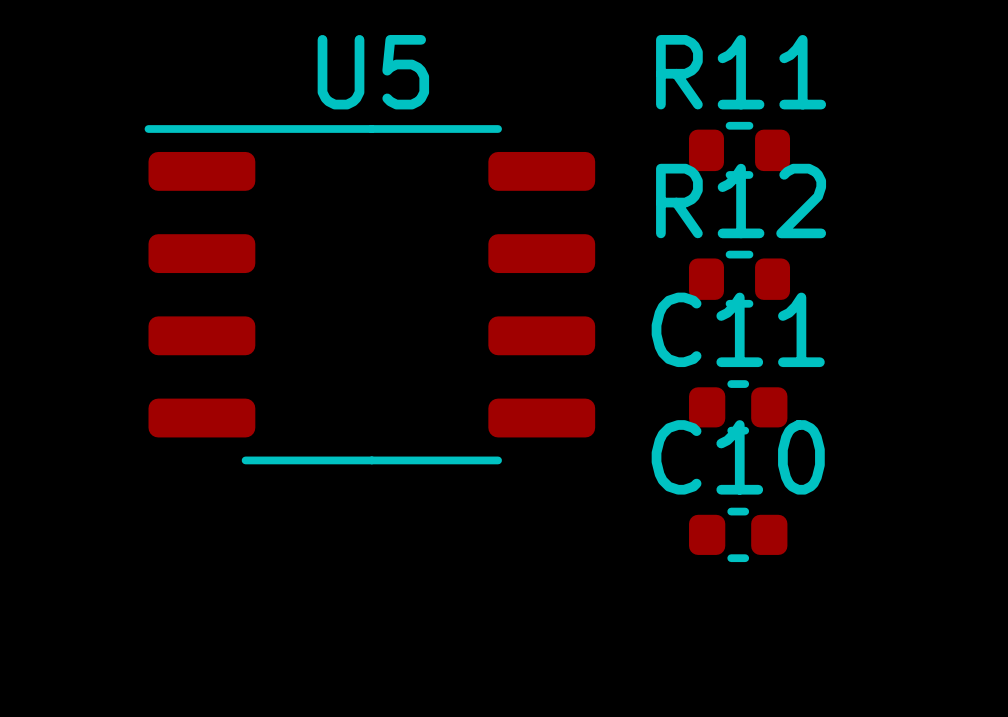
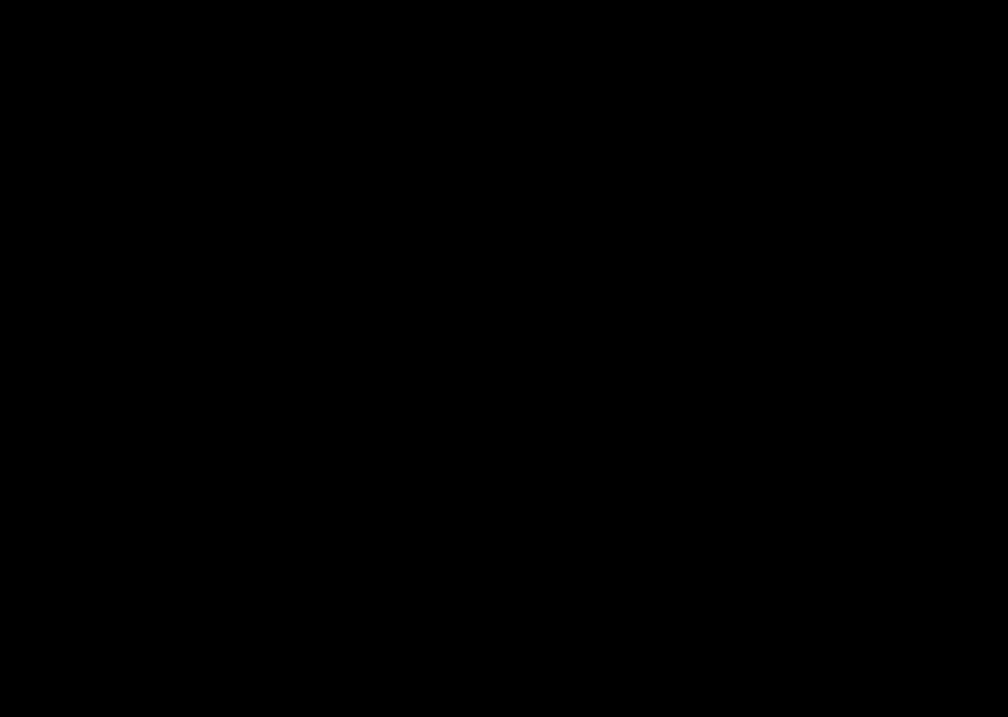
R11: (739, 150) -> none
R12: (739, 279) -> none
U5: (369, 294) -> none
C11: (738, 407) -> none
C10: (738, 534) -> none

